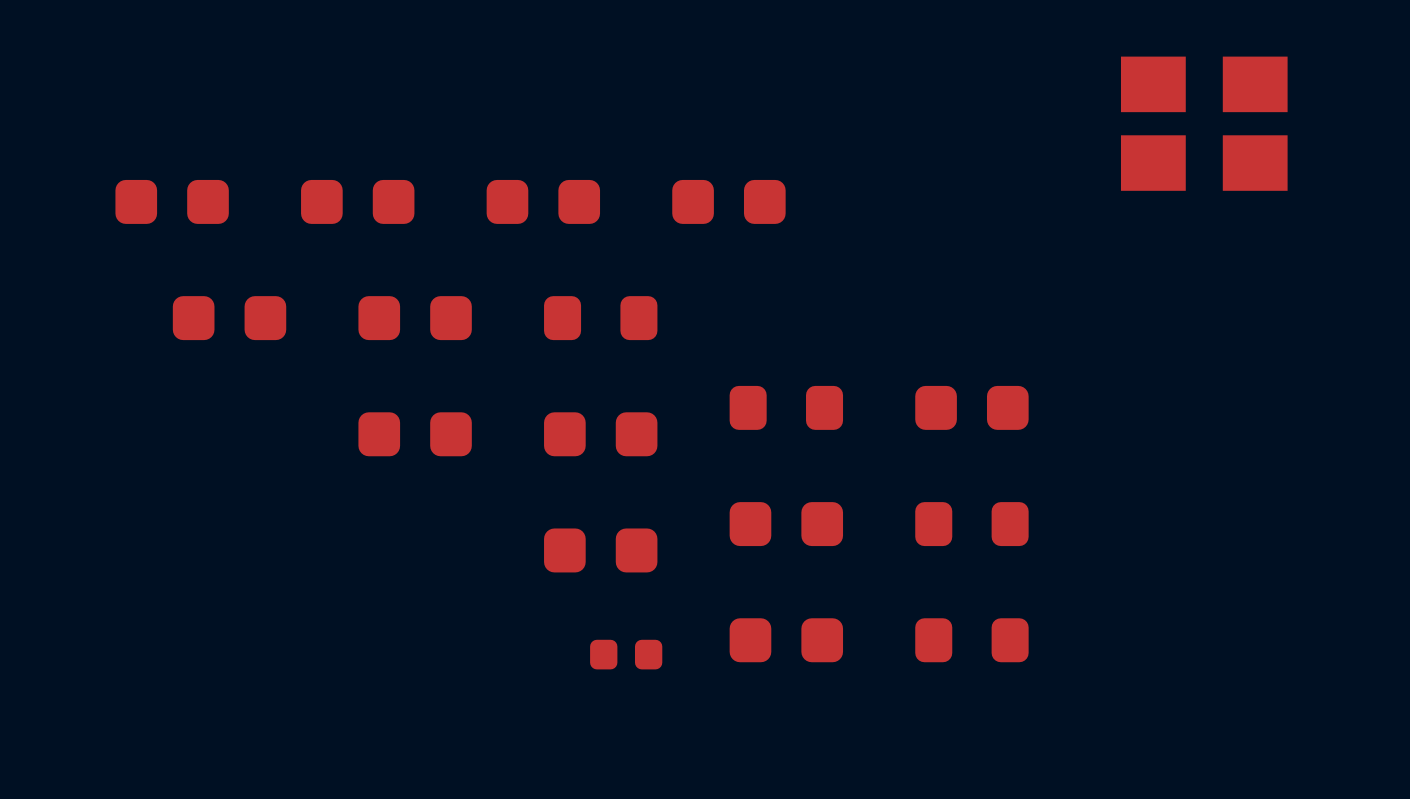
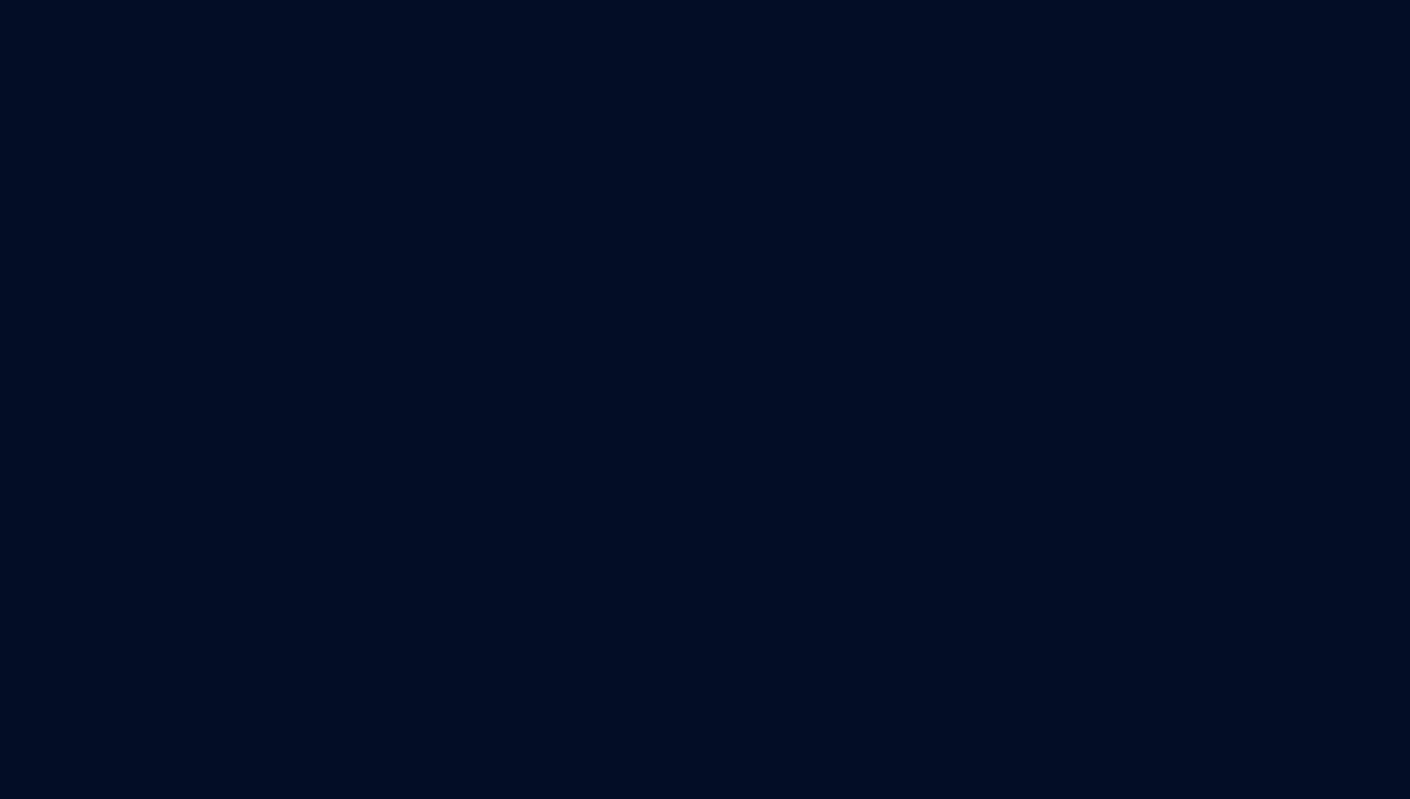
part: (1204, 123) -> none
part: (172, 201) -> none
part: (357, 201) -> none
part: (543, 201) -> none
part: (728, 201) -> none
part: (229, 318) -> none
part: (415, 318) -> none
part: (600, 318) -> none
part: (786, 407) -> none
part: (971, 407) -> none
part: (415, 434) -> none
part: (600, 434) -> none
part: (786, 524) -> none
part: (971, 524) -> none
part: (600, 550) -> none
part: (786, 640) -> none
part: (971, 640) -> none
part: (626, 654) -> none

